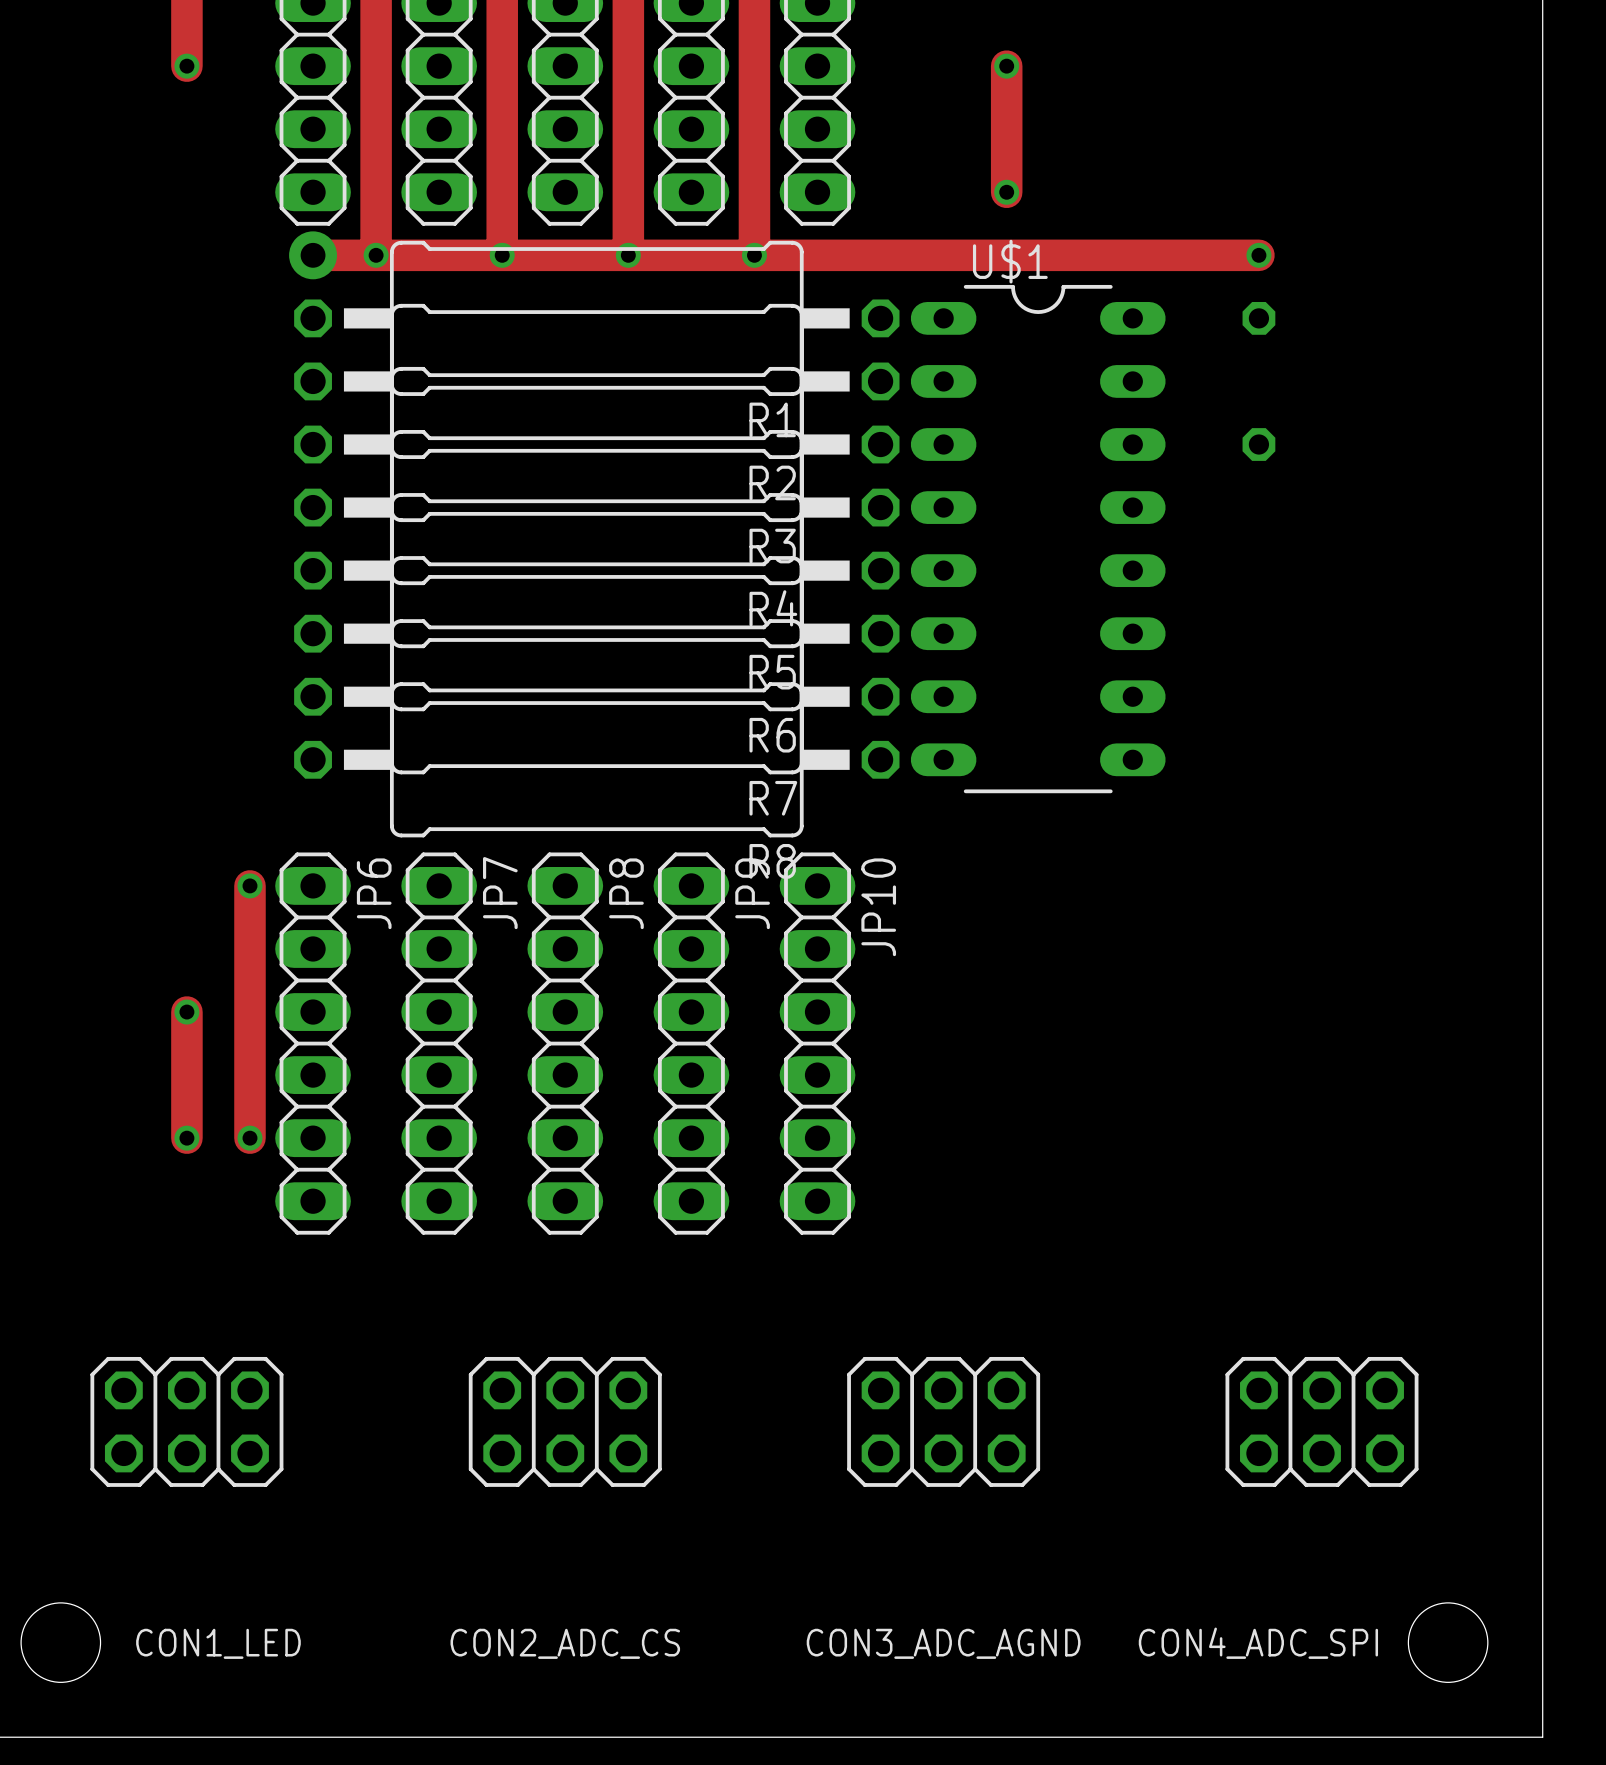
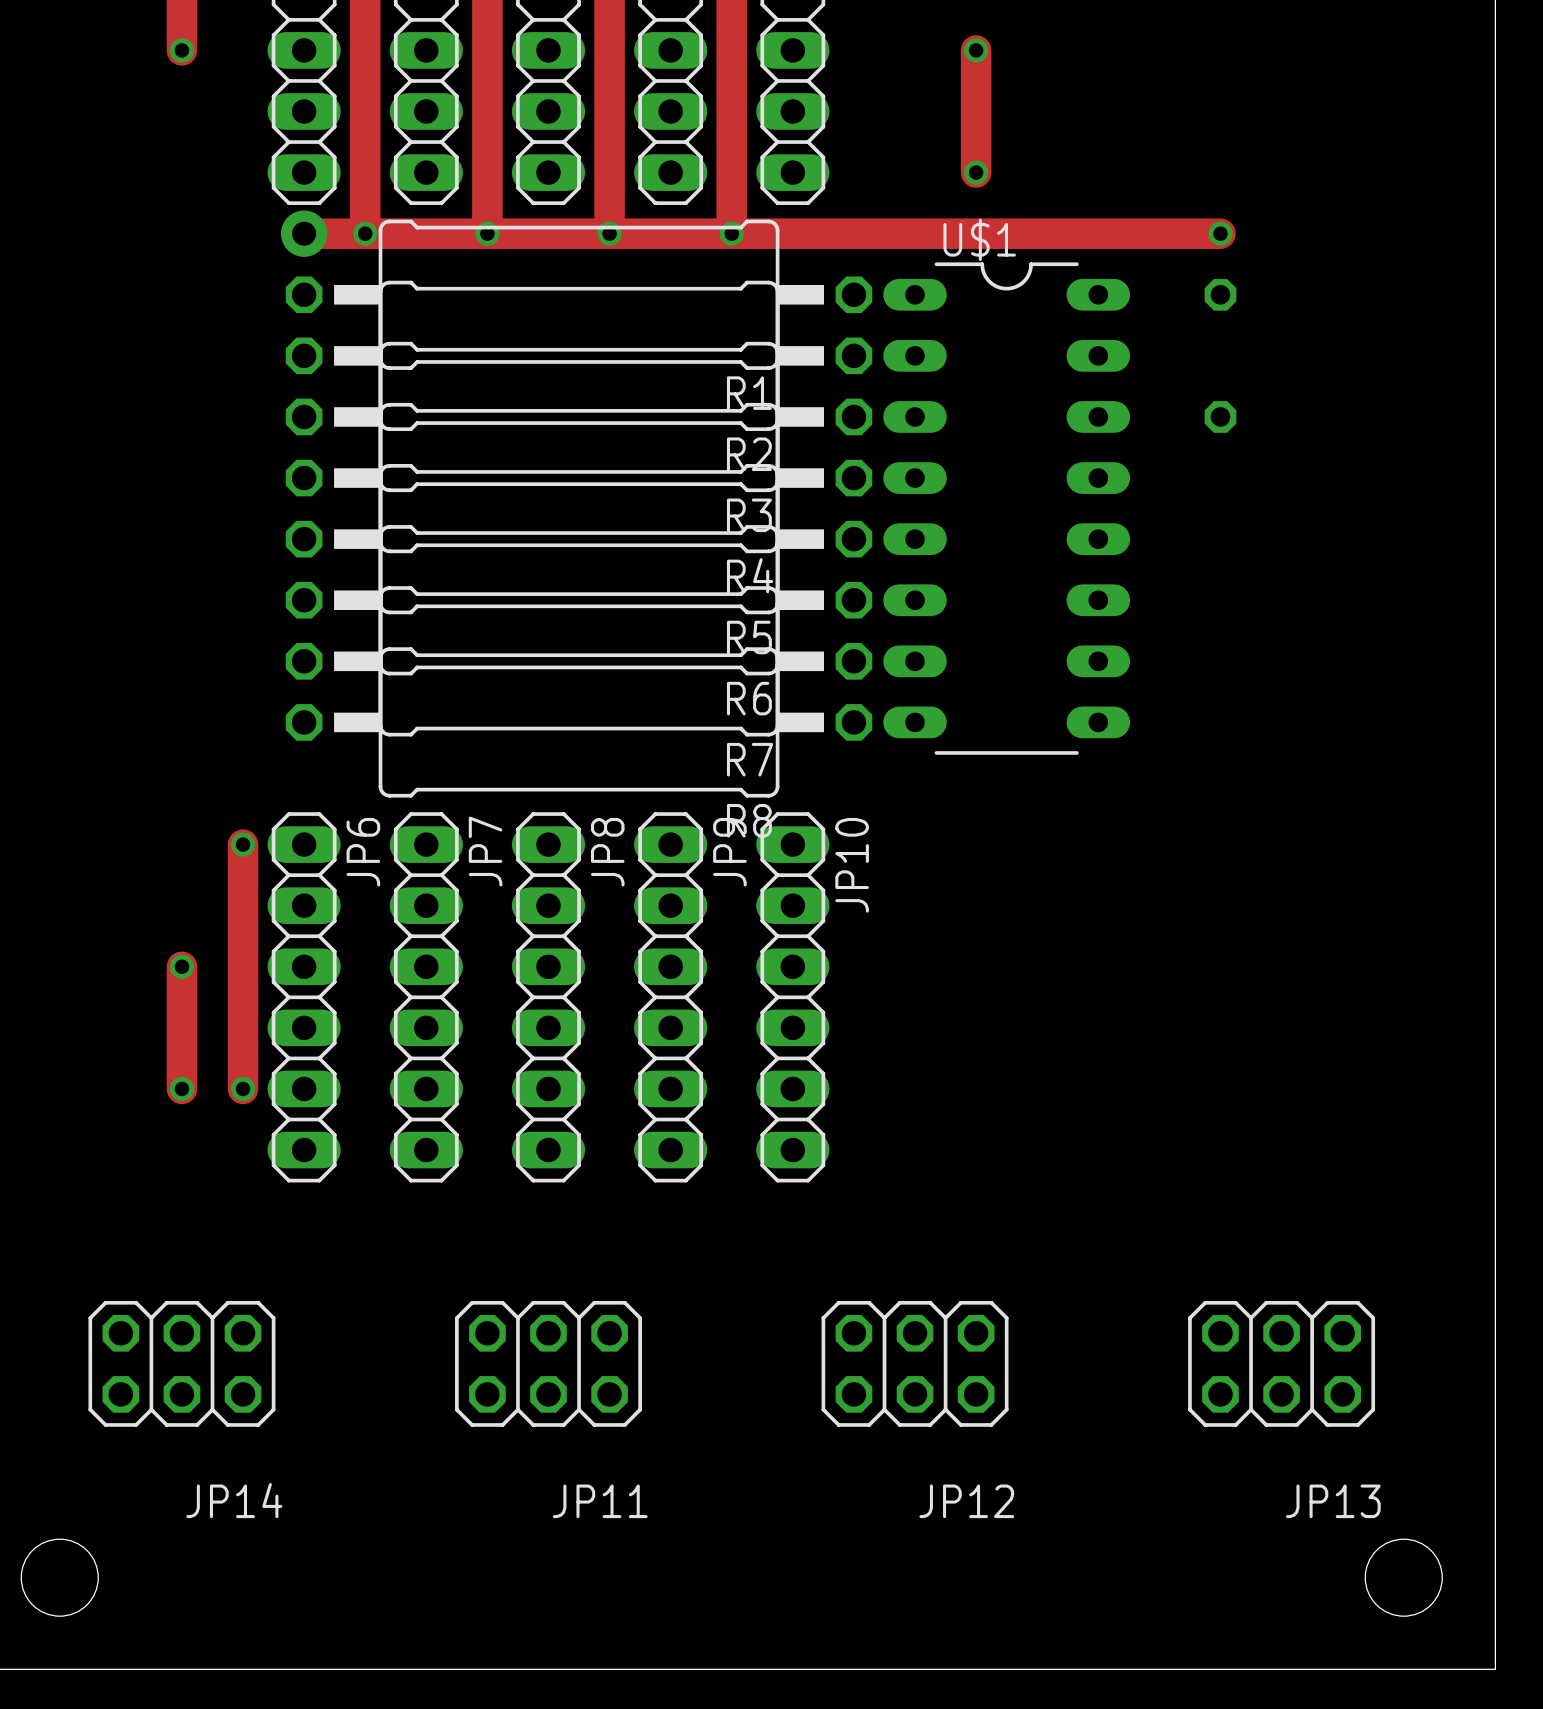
CON1_LED name: CON1_LED (218, 1643) -> JP14 (234, 1500)
CON2_ADC_CS name: CON2_ADC_CS (565, 1643) -> JP11 (600, 1501)
CON3_ADC_AGND name: CON3_ADC_AGND (943, 1643) -> JP12 (966, 1501)
CON4_ADC_SPI name: CON4_ADC_SPI (1258, 1643) -> JP13 (1333, 1501)

